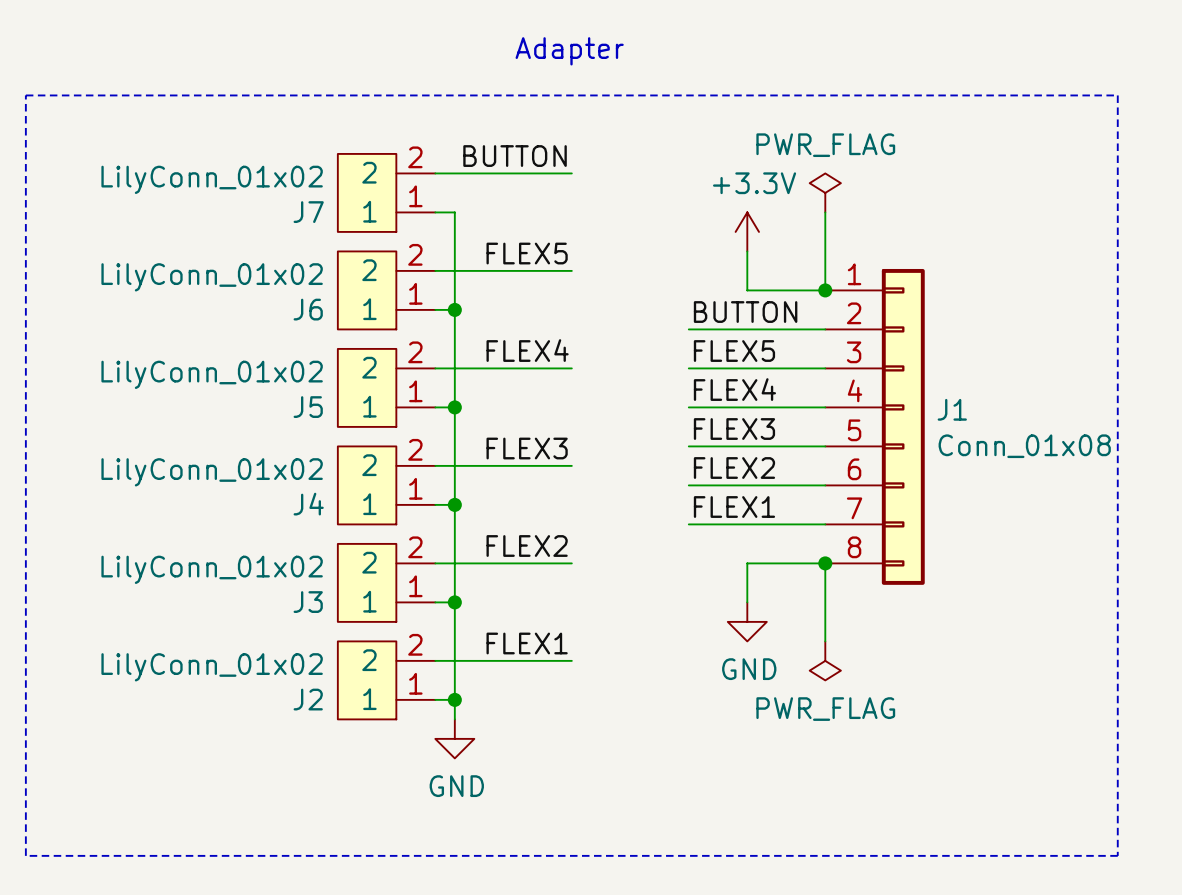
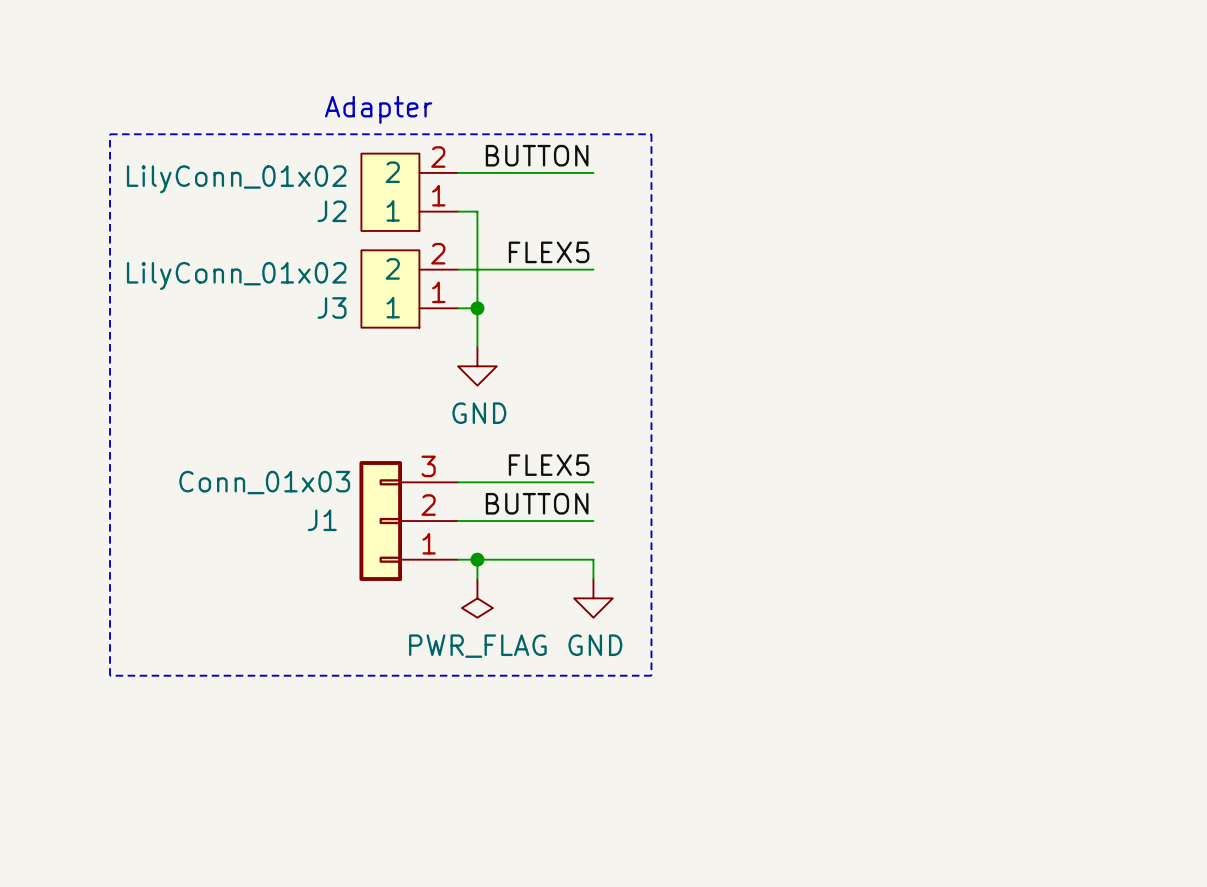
text position: Adapter (569, 51) -> Adapter (378, 109)
line: (25, 95) (25, 855) (1117, 855) (1117, 95) (25, 95) -> none
line: none -> (110, 134) (651, 134) (651, 675) (110, 675) (110, 134)
power symbol: PWR_FLAG (825, 192) -> none
J7 name: J7 (308, 212) -> J2 (332, 211)
wire: (825, 212) (825, 290) (747, 290) (747, 251) -> none
power symbol: +3.3V (747, 231) -> none
J1 symbol: [825, 268, 925, 585] -> [359, 461, 459, 581]
junction: (825, 290) -> none
J6 name: J6 (308, 309) -> J3 (332, 307)
label position: BUTTON (745, 312) -> BUTTON (537, 503)
wire: (688, 329) (825, 329) -> none
wire: (454, 348) (454, 563) -> none
label: FLEX4 (527, 350) -> none
label position: FLEX5 (734, 351) -> FLEX5 (549, 465)
wire: (435, 368) (571, 368) -> none
power symbol: none -> GND (477, 366)
wire: (688, 368) (825, 368) -> none
J5: LilyConn_01x02 (386, 387) -> none
label: FLEX4 (734, 389) -> none
wire: (435, 407) (454, 407) -> none
junction: (454, 407) -> none
wire: (688, 407) (825, 407) -> none
J1 name position: J1 (952, 409) -> J1 (322, 520)
label: FLEX3 (734, 429) -> none
wire: (688, 446) (825, 446) -> none
J1 value: Conn_01x08 (1024, 446) -> Conn_01x03 (264, 482)
label: FLEX3 (527, 448) -> none
wire: (435, 465) (571, 465) -> none
label: FLEX2 (734, 468) -> none
J4: LilyConn_01x02 (386, 485) -> none
wire: (688, 485) (825, 485) -> (458, 482) (593, 482)
wire: (435, 504) (454, 504) -> none
junction: (454, 504) -> none
label: FLEX1 (734, 507) -> none
wire: (688, 524) (825, 524) -> (458, 521) (593, 521)
label: FLEX2 (527, 546) -> none
junction: none -> (477, 559)
wire: none -> (593, 559) (593, 579)
junction: (825, 563) -> none
J3: LilyConn_01x02 (386, 582) -> none
wire: (454, 582) (454, 719) -> none
wire: (435, 602) (454, 602) -> none
power symbol: none -> PWR_FLAG (477, 598)
junction: (454, 602) -> none
power symbol: none -> GND (593, 598)
wire: (747, 602) (747, 563) (825, 563) (825, 641) -> none
power symbol: GND (747, 621) -> none
label: FLEX1 (527, 643) -> none
wire: (435, 660) (571, 660) -> none
power symbol: PWR_FLAG (825, 660) -> none
J2: LilyConn_01x02 (386, 680) -> none
wire: (435, 699) (454, 699) -> none
junction: (454, 699) -> none
power symbol: GND (454, 738) -> none

